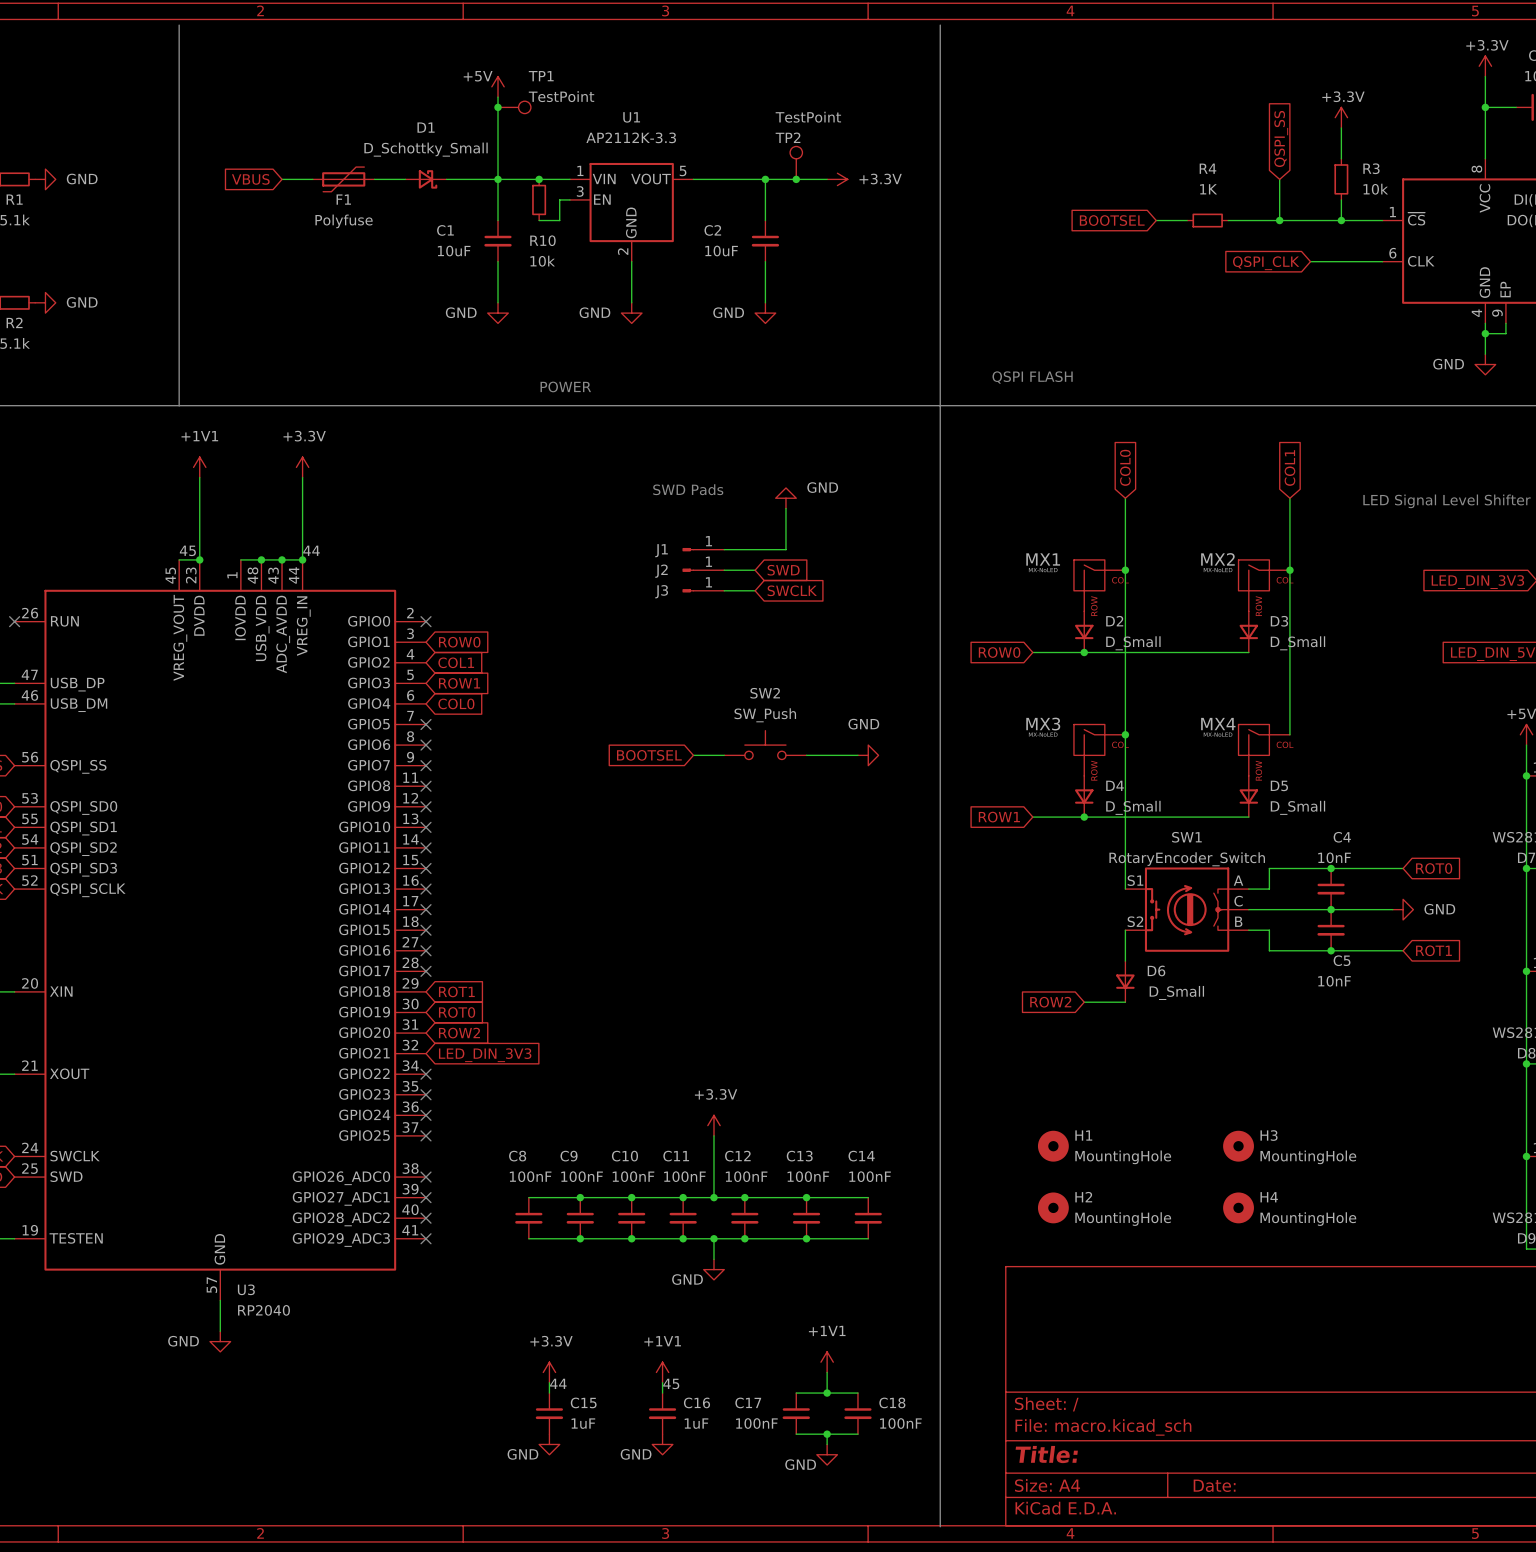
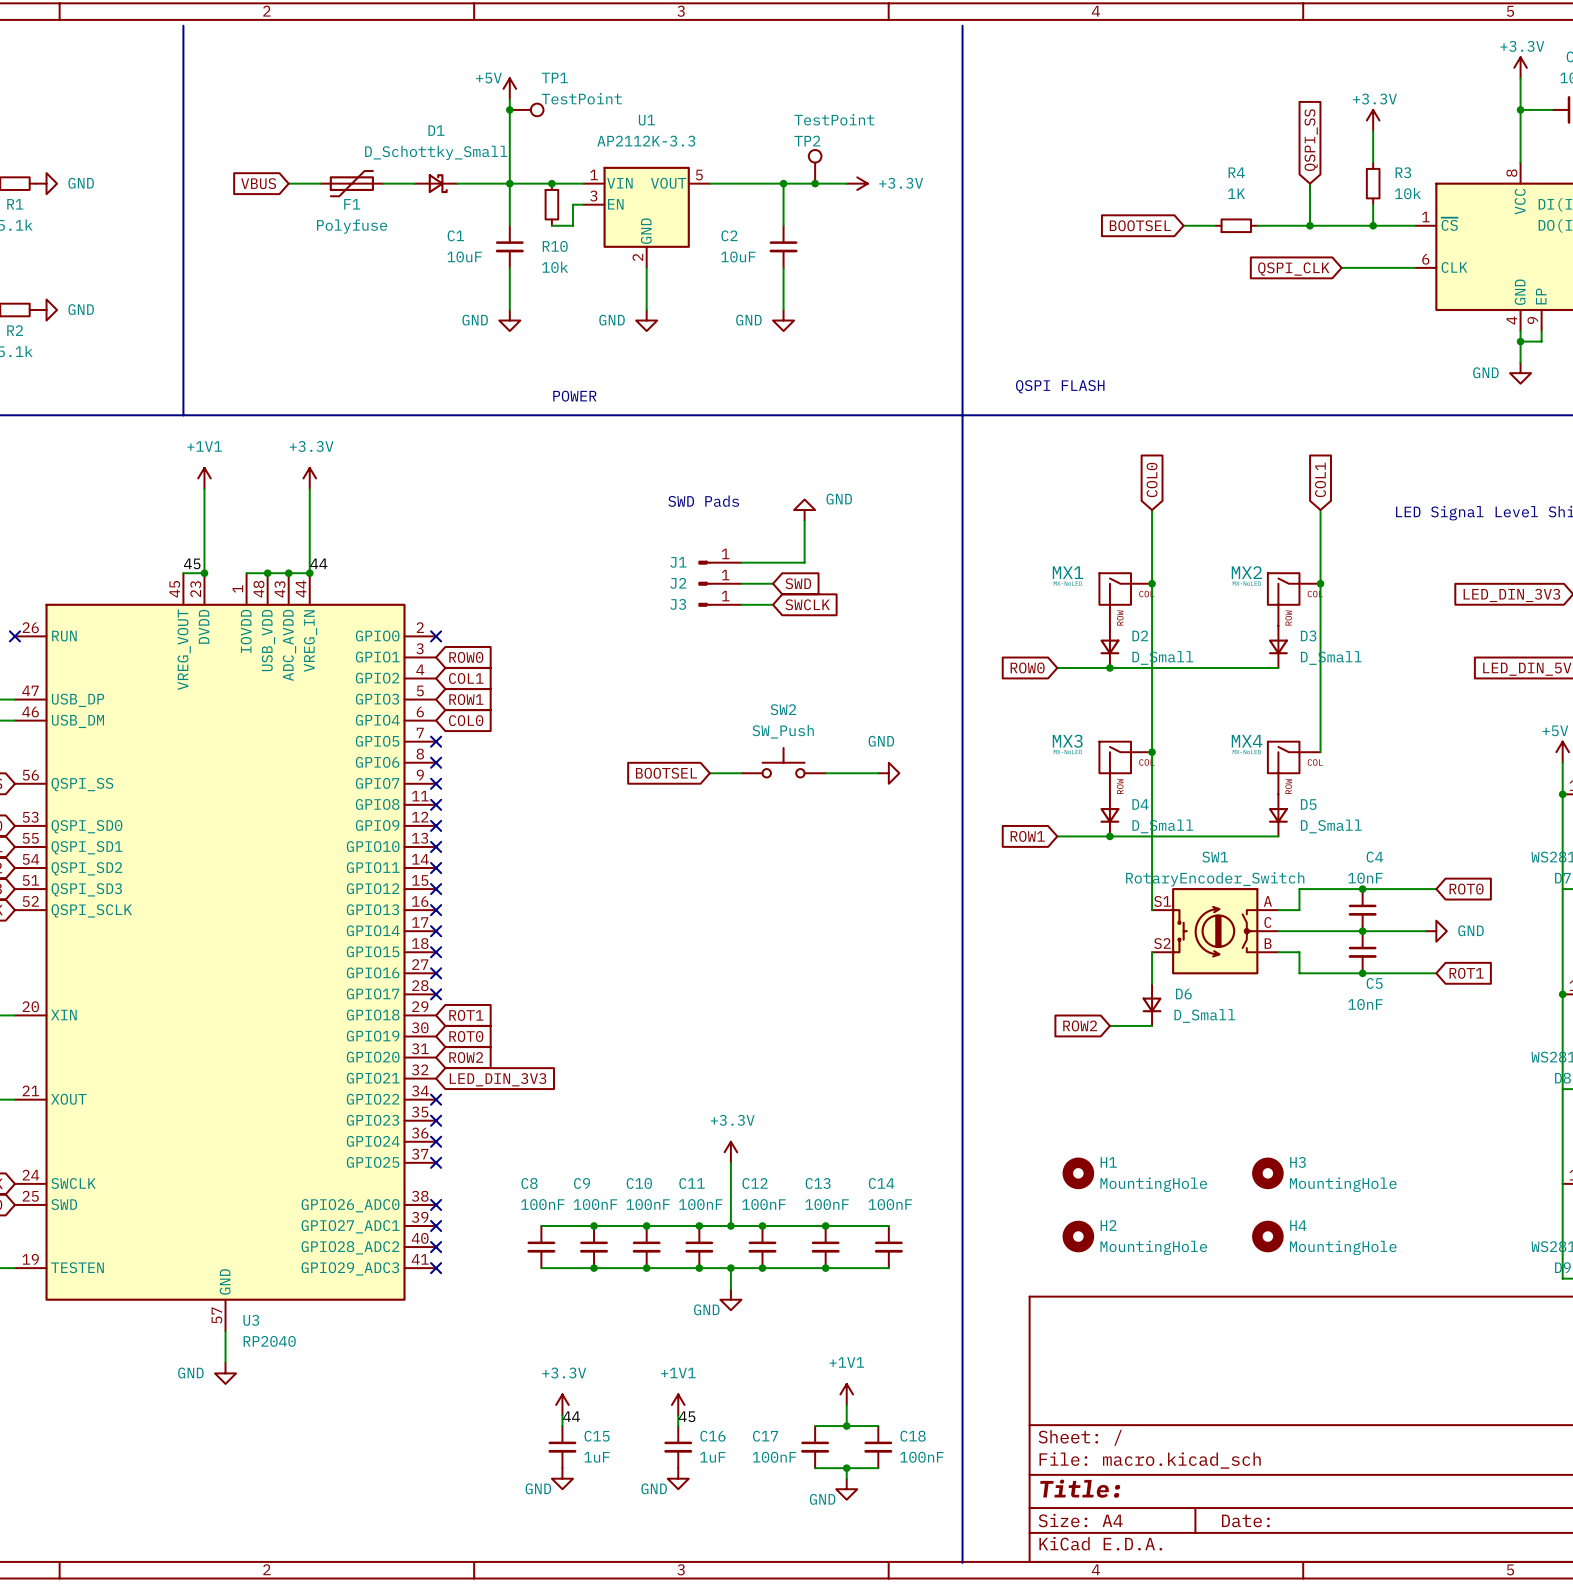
junction: (1526, 868) -> none
junction: (1526, 1063) -> none
junction: (1526, 1156) -> none

